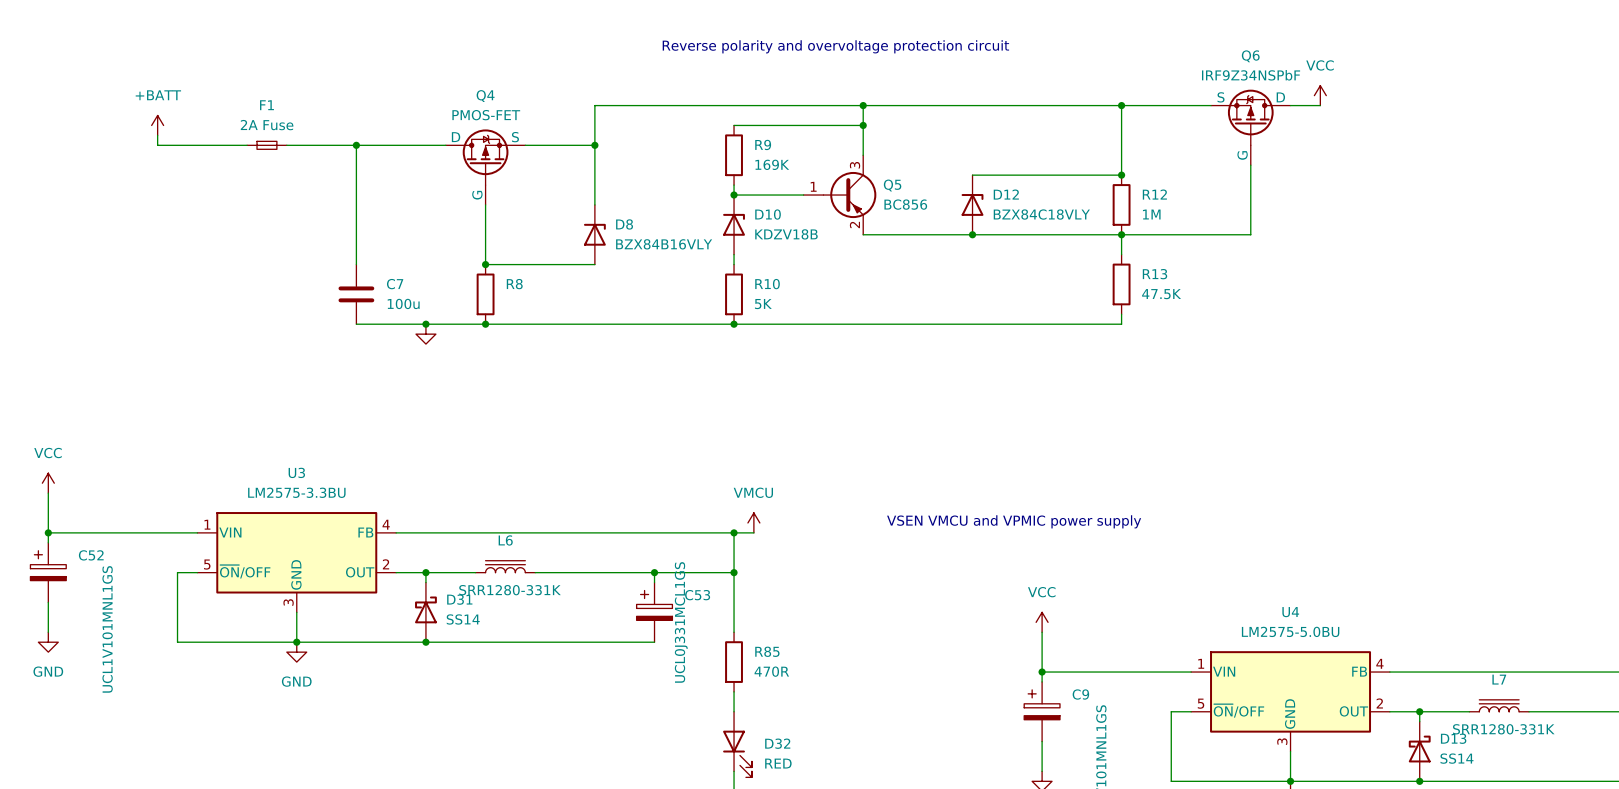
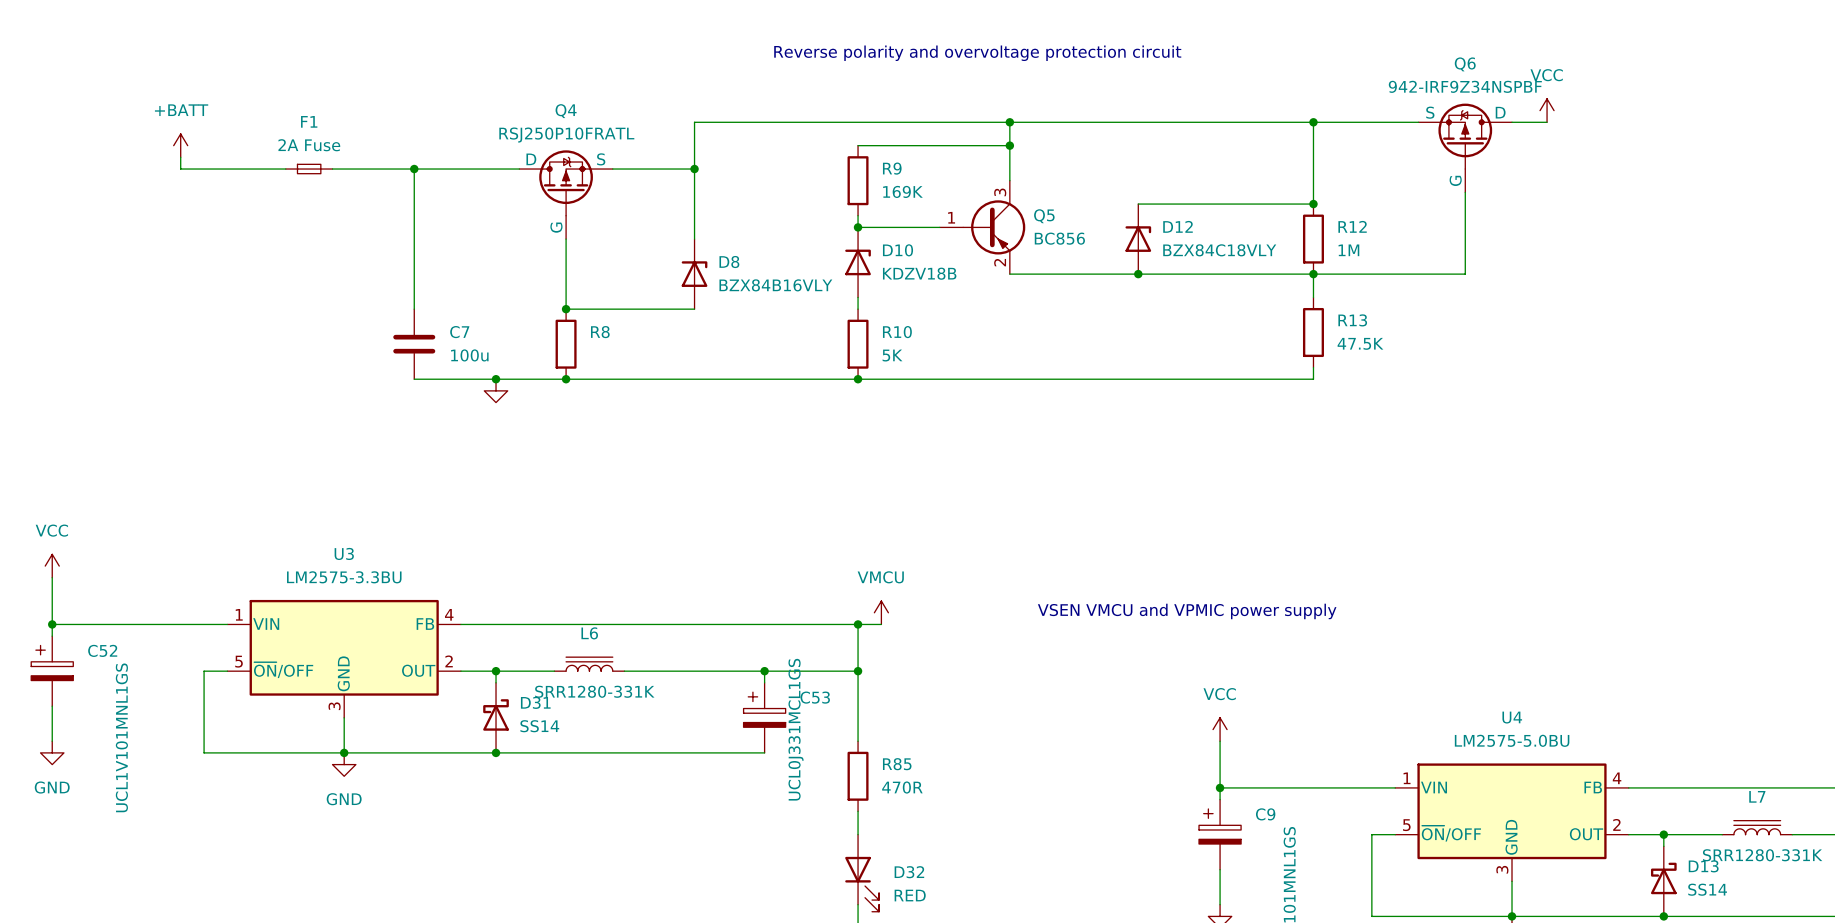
Q6 value: IRF9Z34NSPbF (1251, 75) -> 942-IRF9Z34NSPBF (1465, 86)
Q4 value: PMOS-FET (486, 115) -> RSJ250P10FRATL (566, 135)

